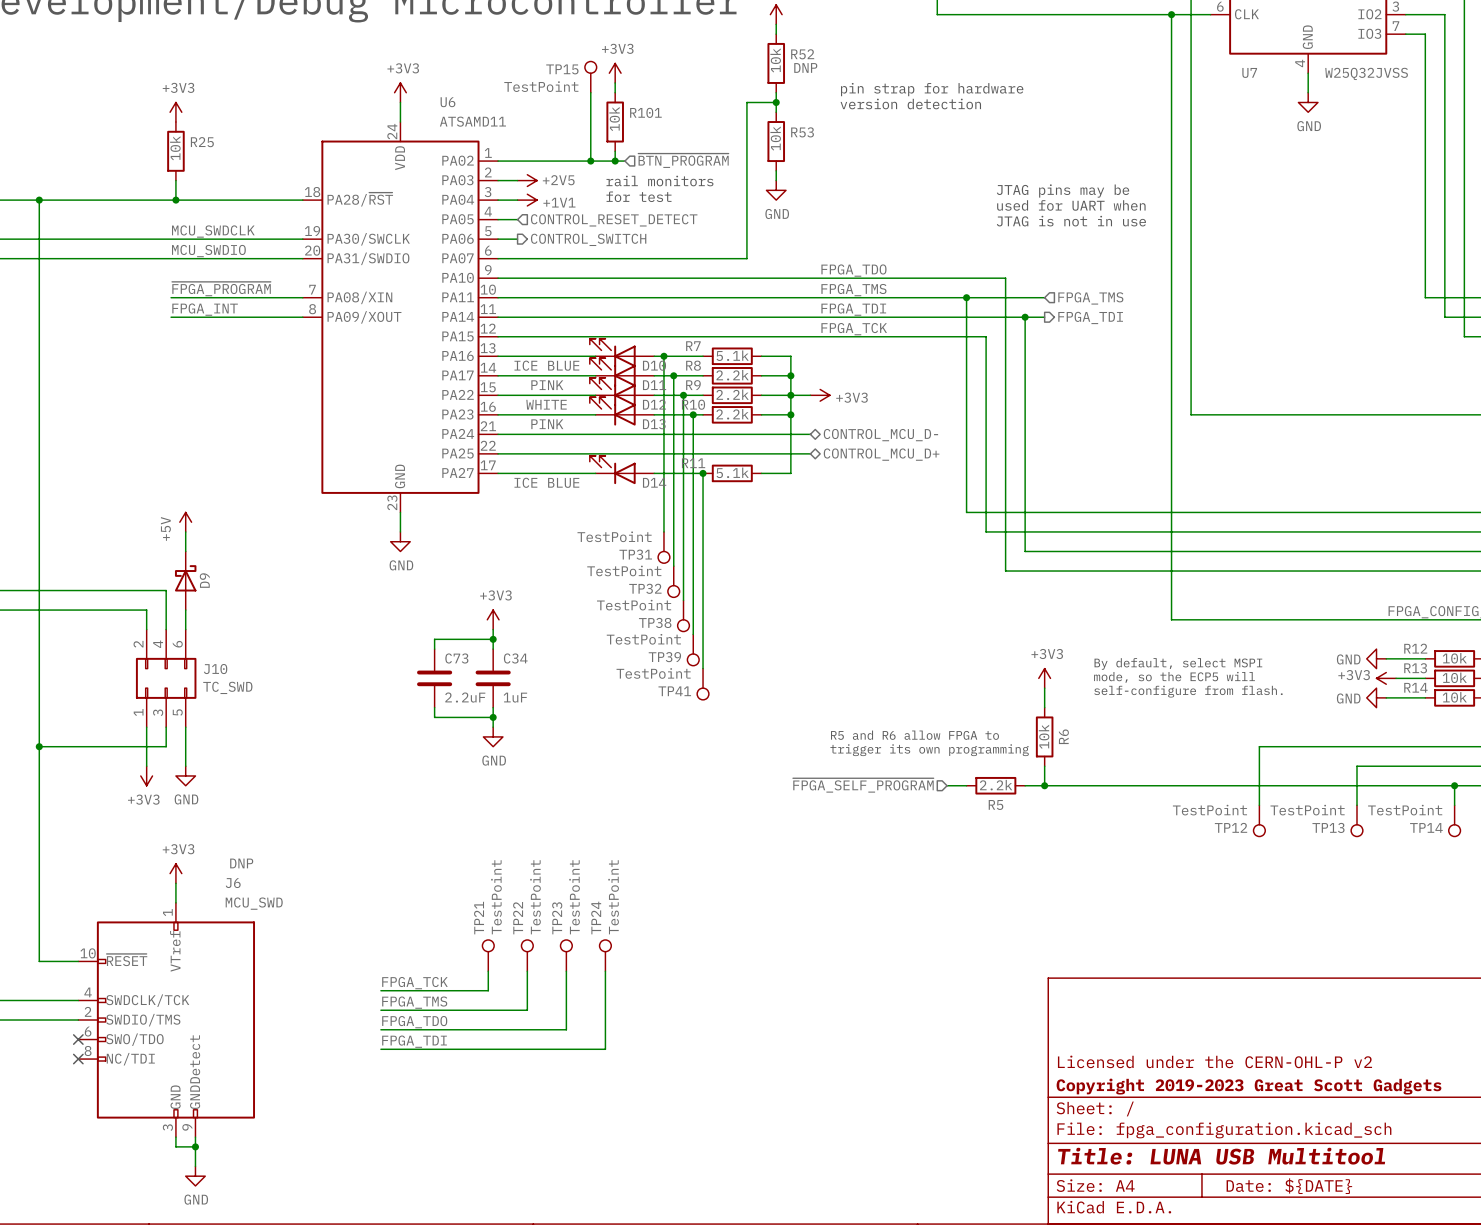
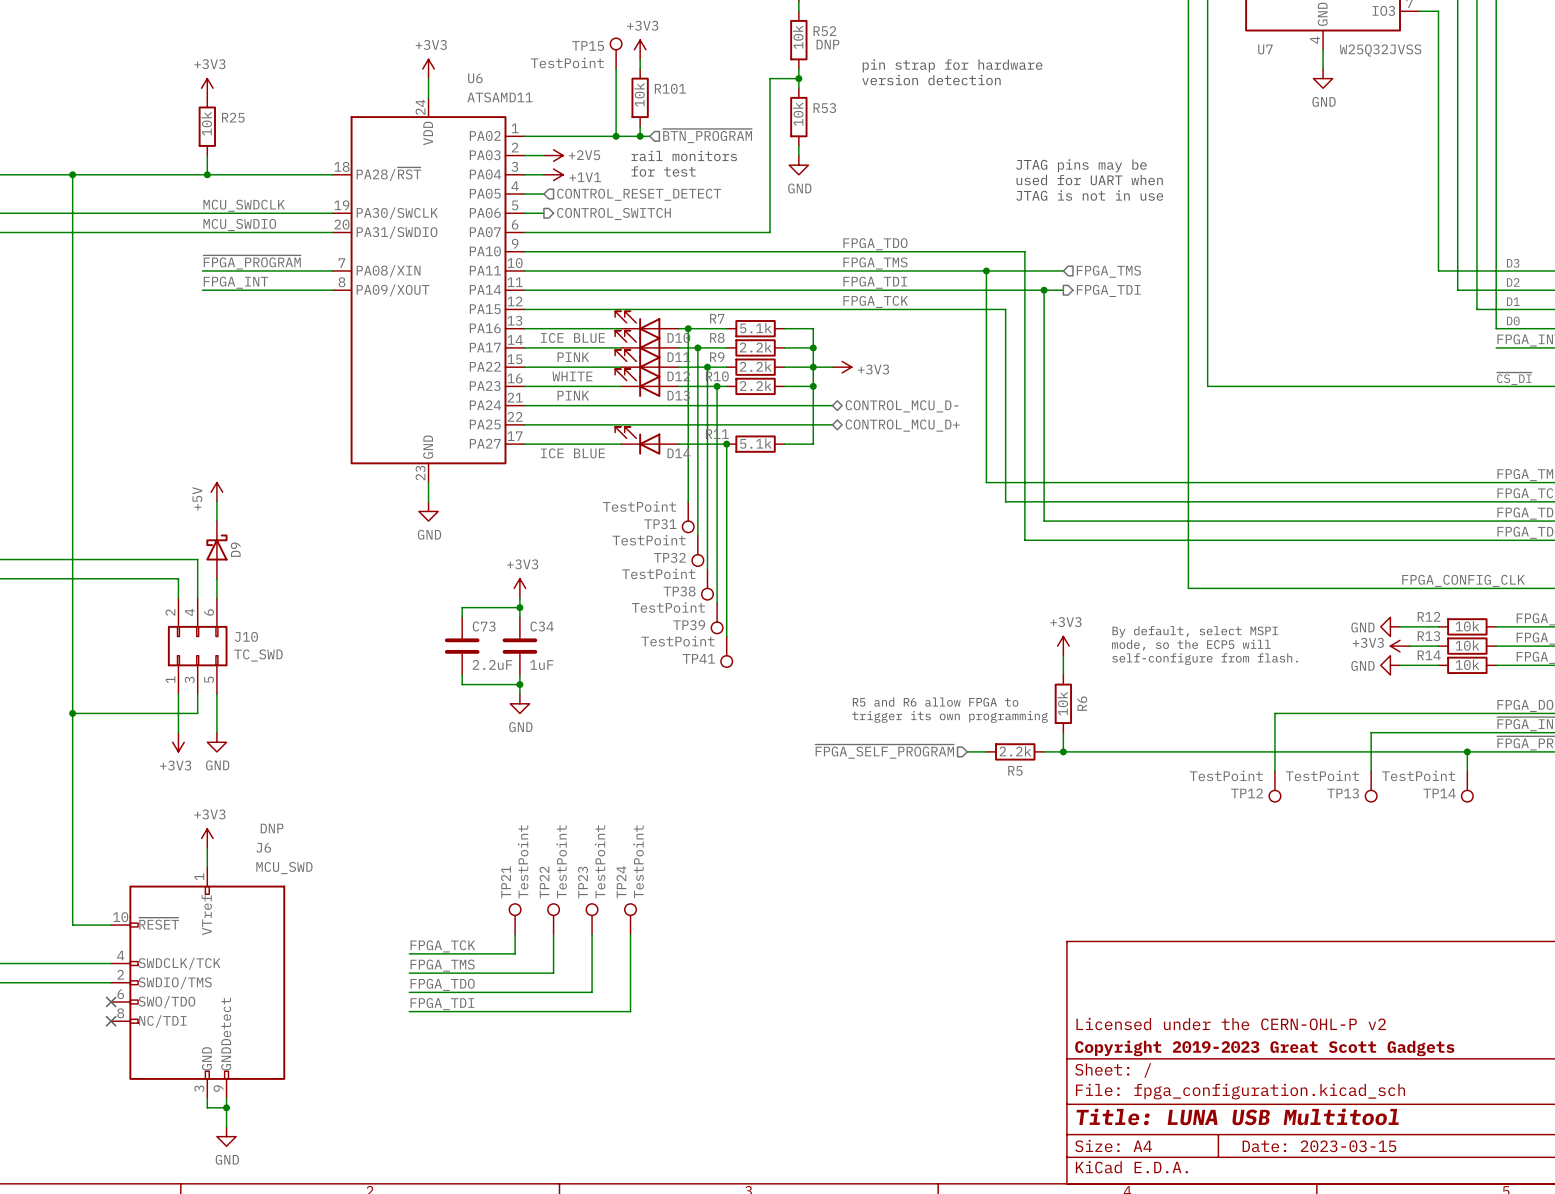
title block: Date: ${DATE} (1289, 1186) -> Date: 2023-03-15 (1319, 1146)

